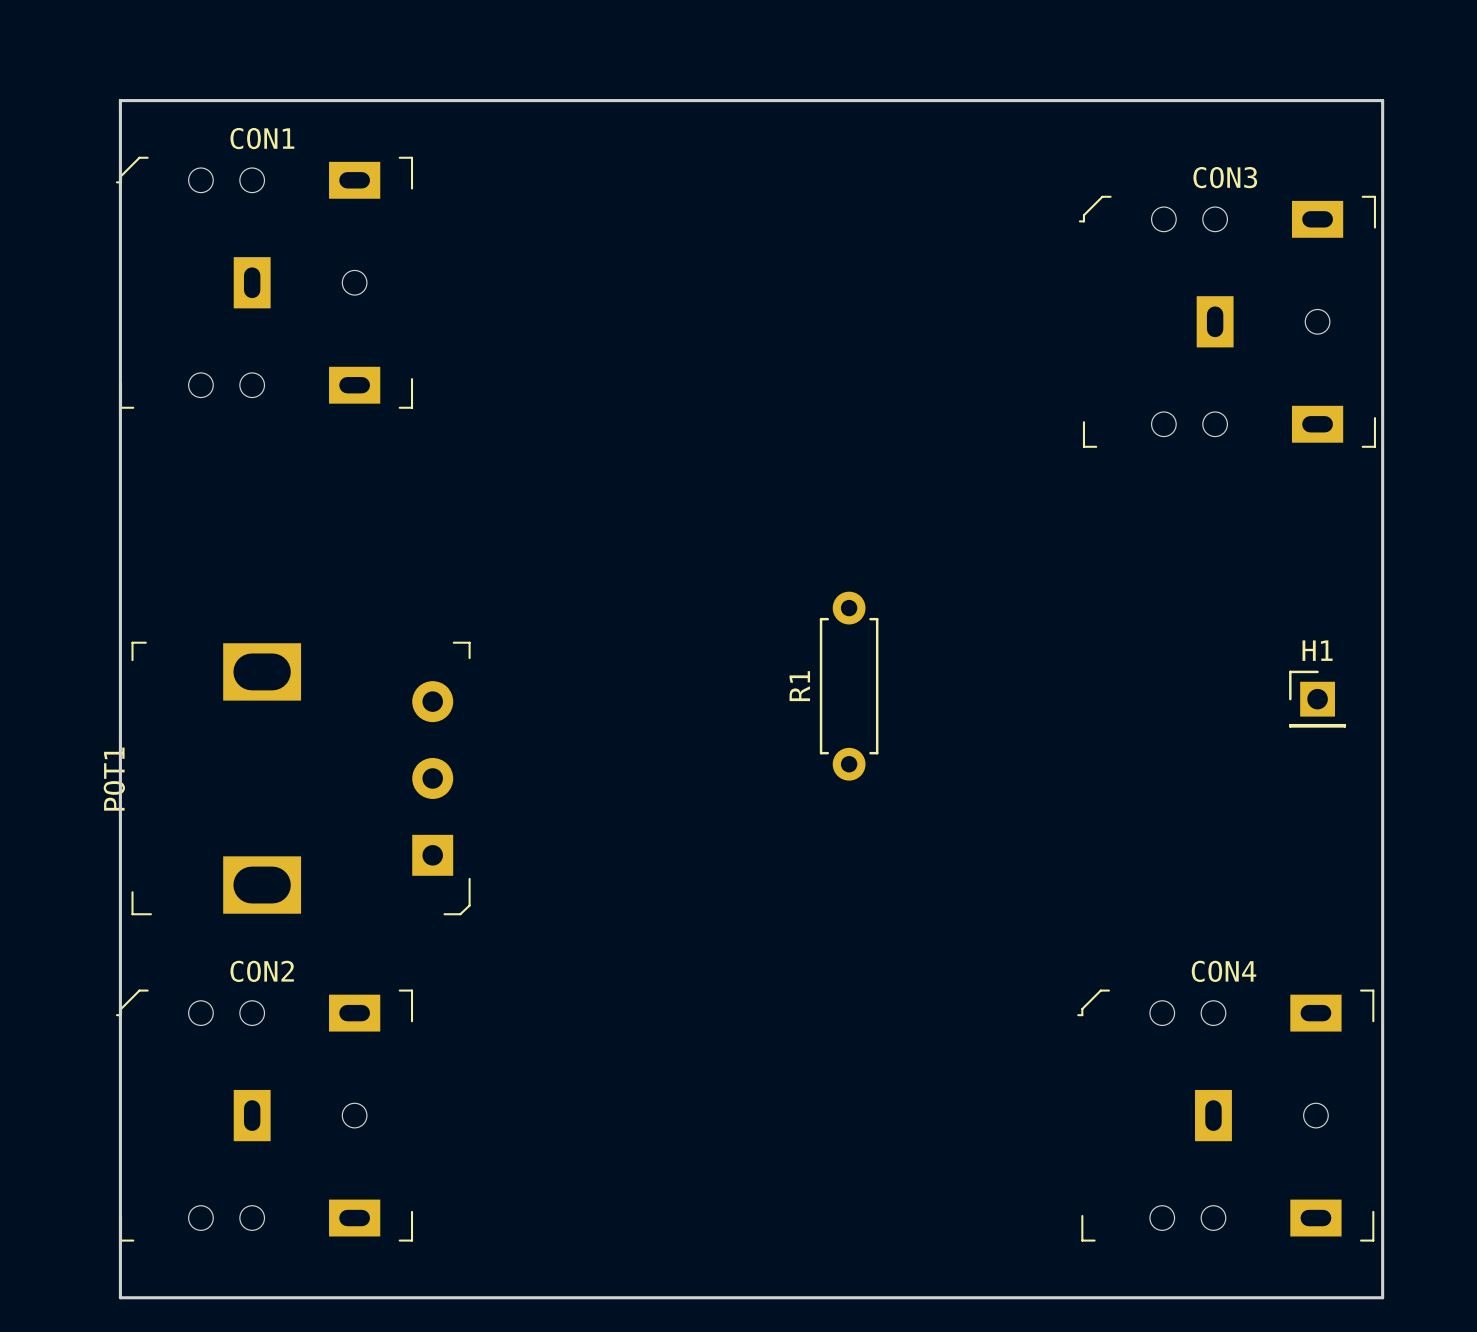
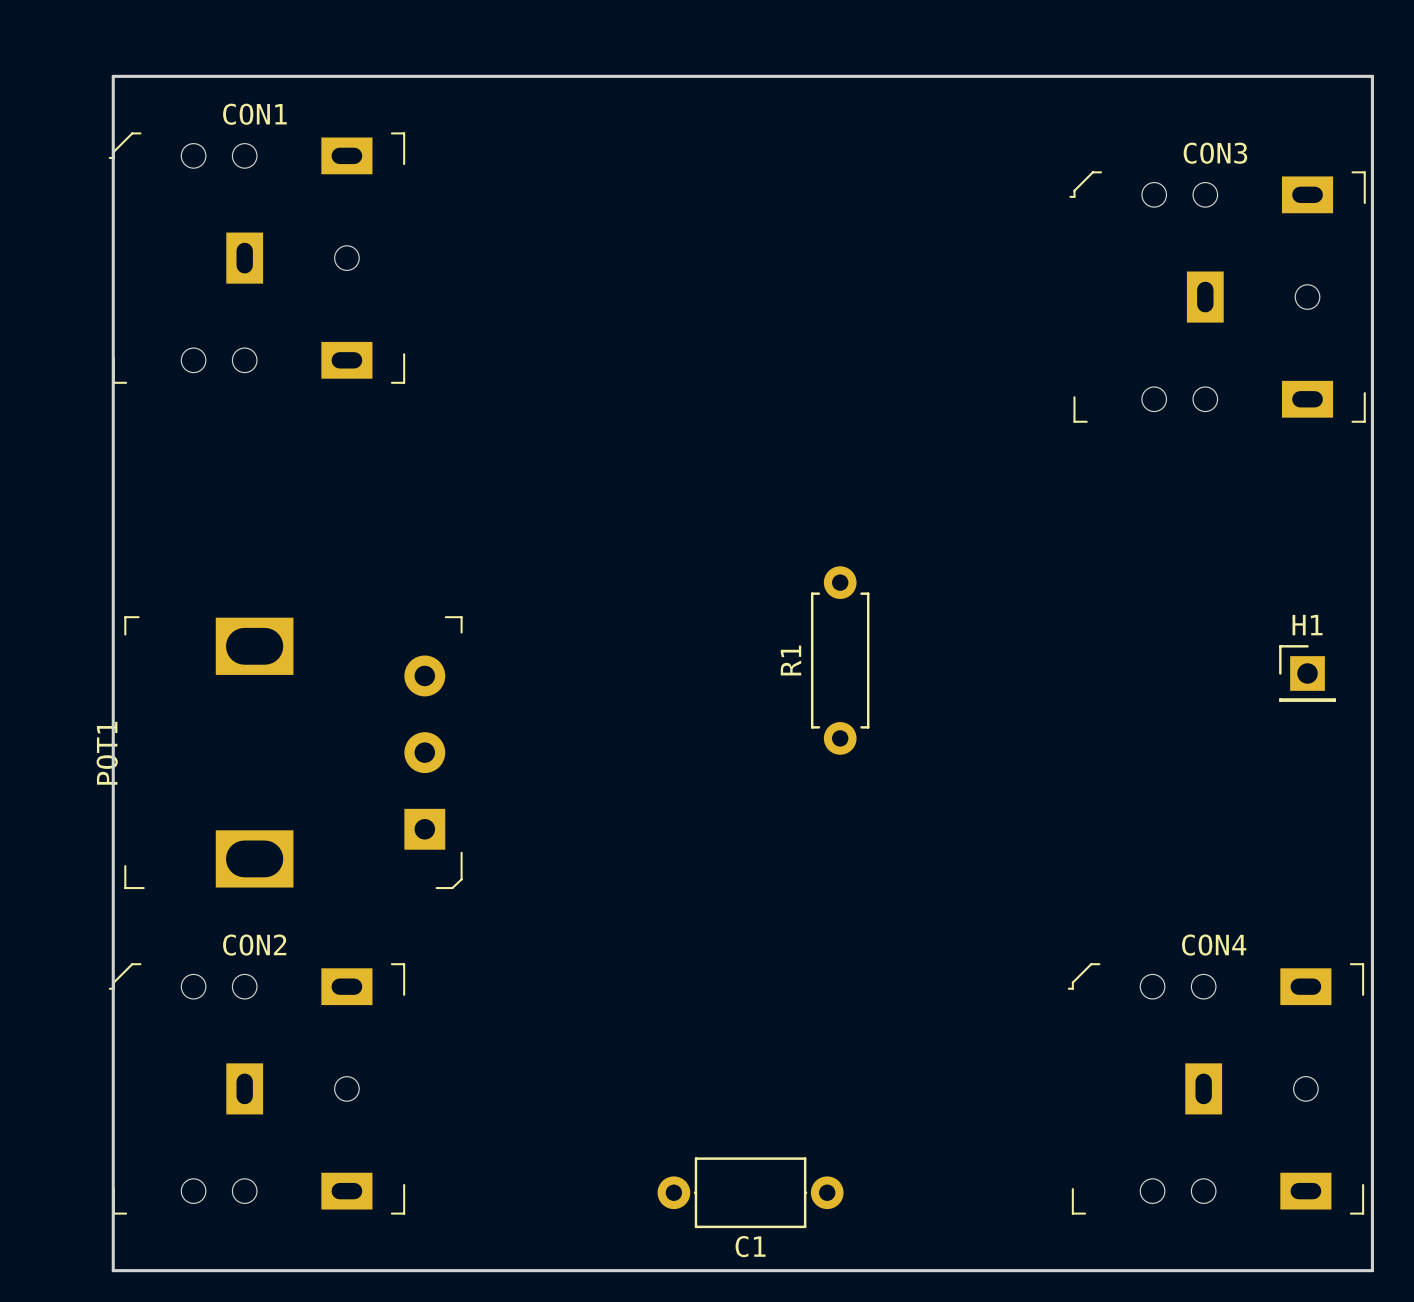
C1: none -> (750, 1192)

